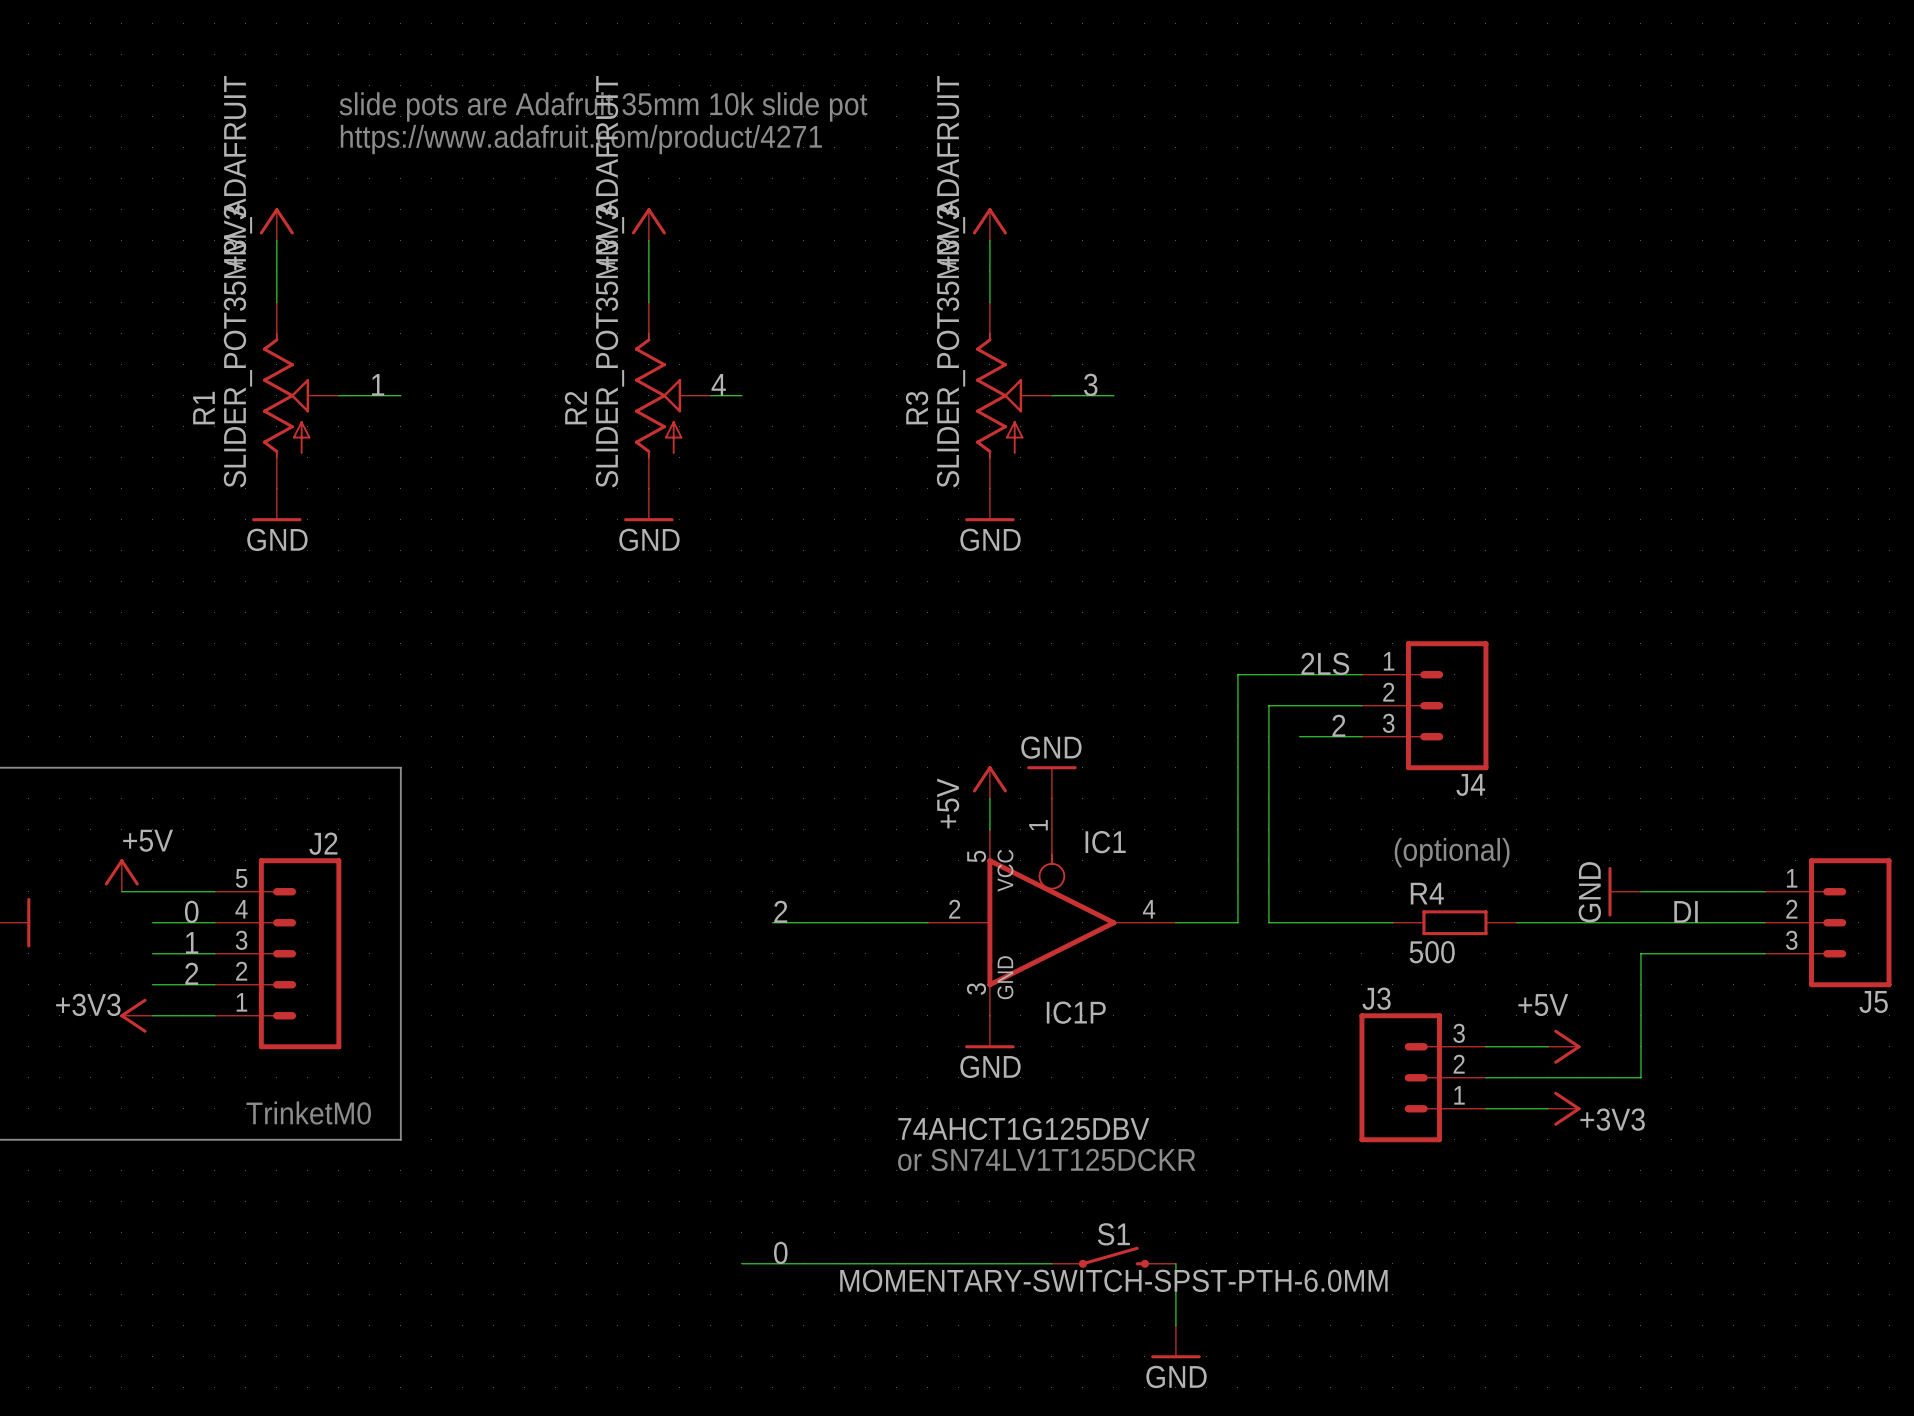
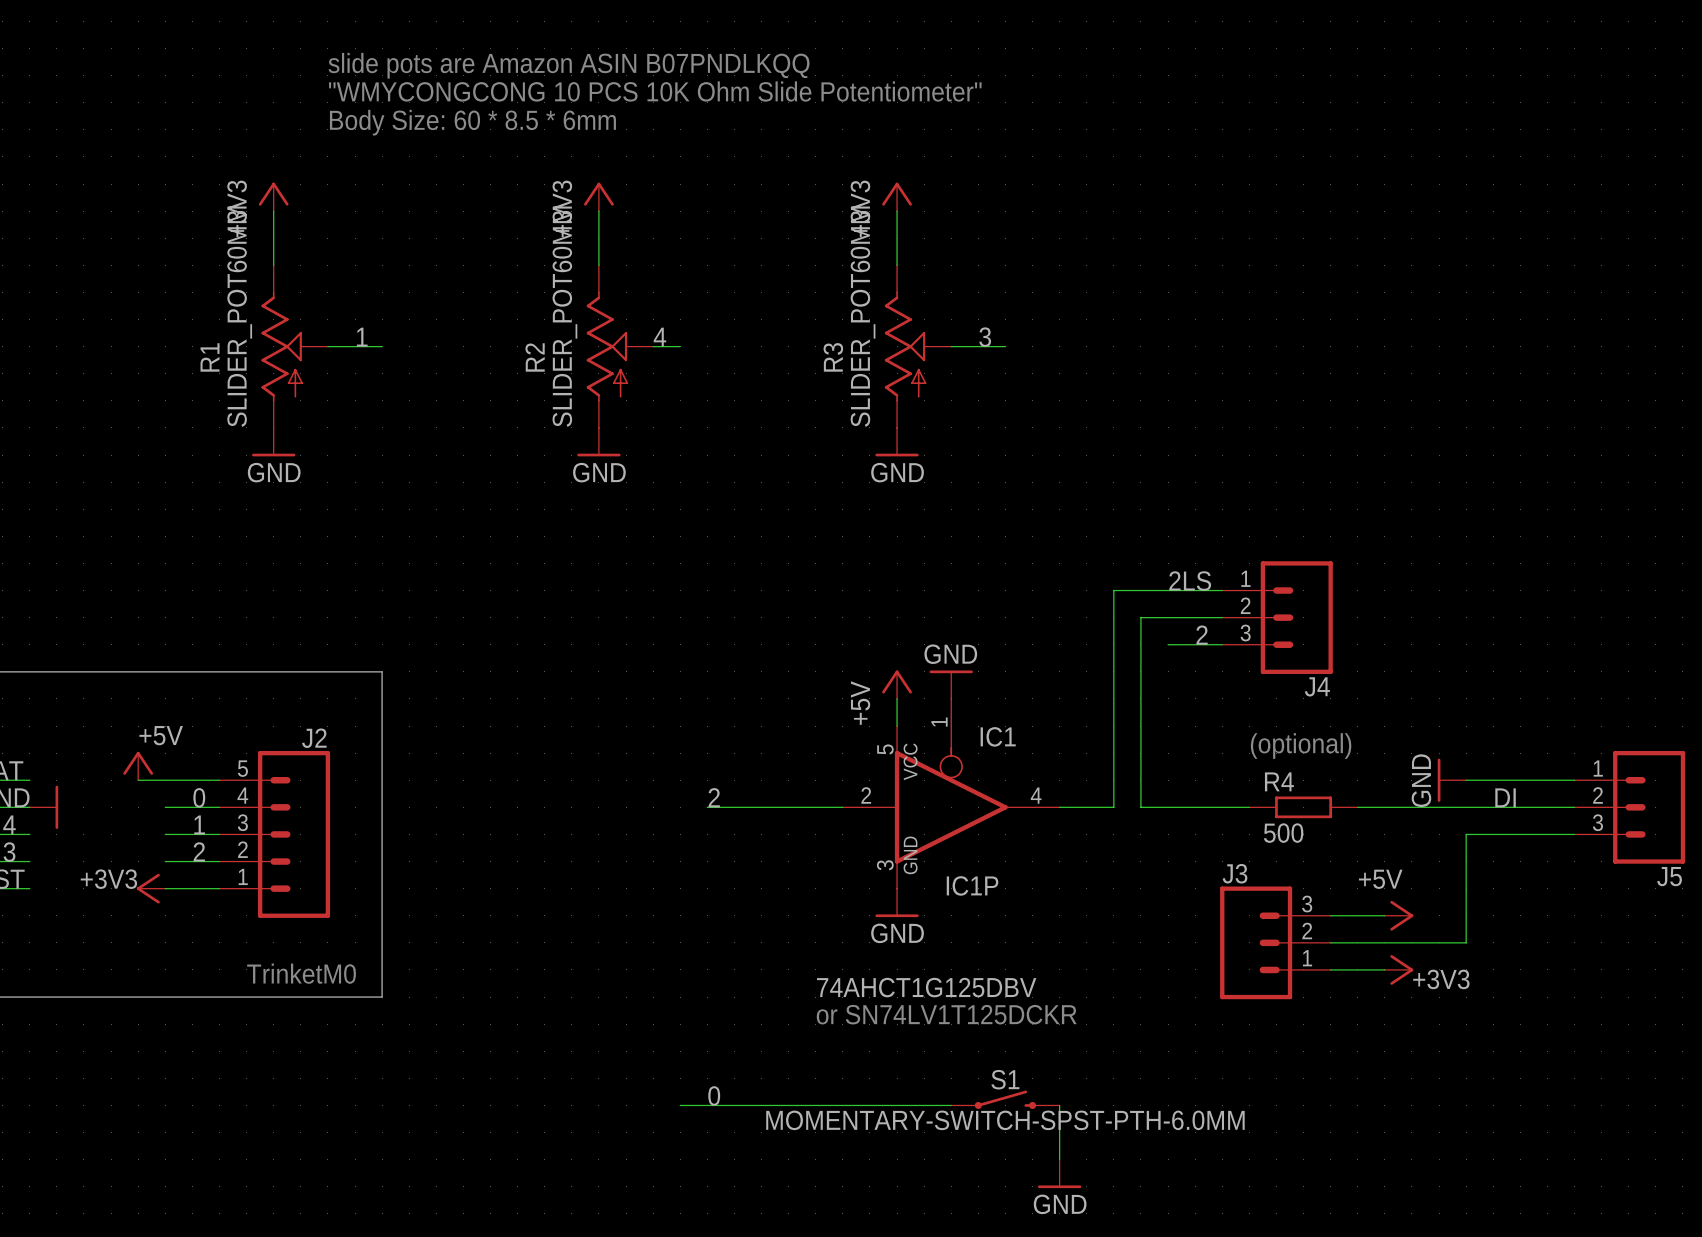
text: none -> slide pots are Amazon ASIN B07PNDLKQQ (569, 65)
text: slide pots are Adafruit 35mm 10k slide pot (603, 106) -> "WMYCONGCONG 10 PCS 10K Ohm Slide Potentiometer" (655, 91)
text: https://www.adafruit.com/product/4271 (581, 139) -> Body Size: 60 * 8.5 * 6mm (472, 122)
R1 value: SLIDER_POT35MM_ADAFRUIT (237, 281) -> SLIDER_POT60MM (239, 316)
R2 value: SLIDER_POT35MM_ADAFRUIT (609, 281) -> SLIDER_POT60MM (564, 316)
R3 value: SLIDER_POT35MM_ADAFRUIT (951, 281) -> SLIDER_POT60MM (863, 316)

